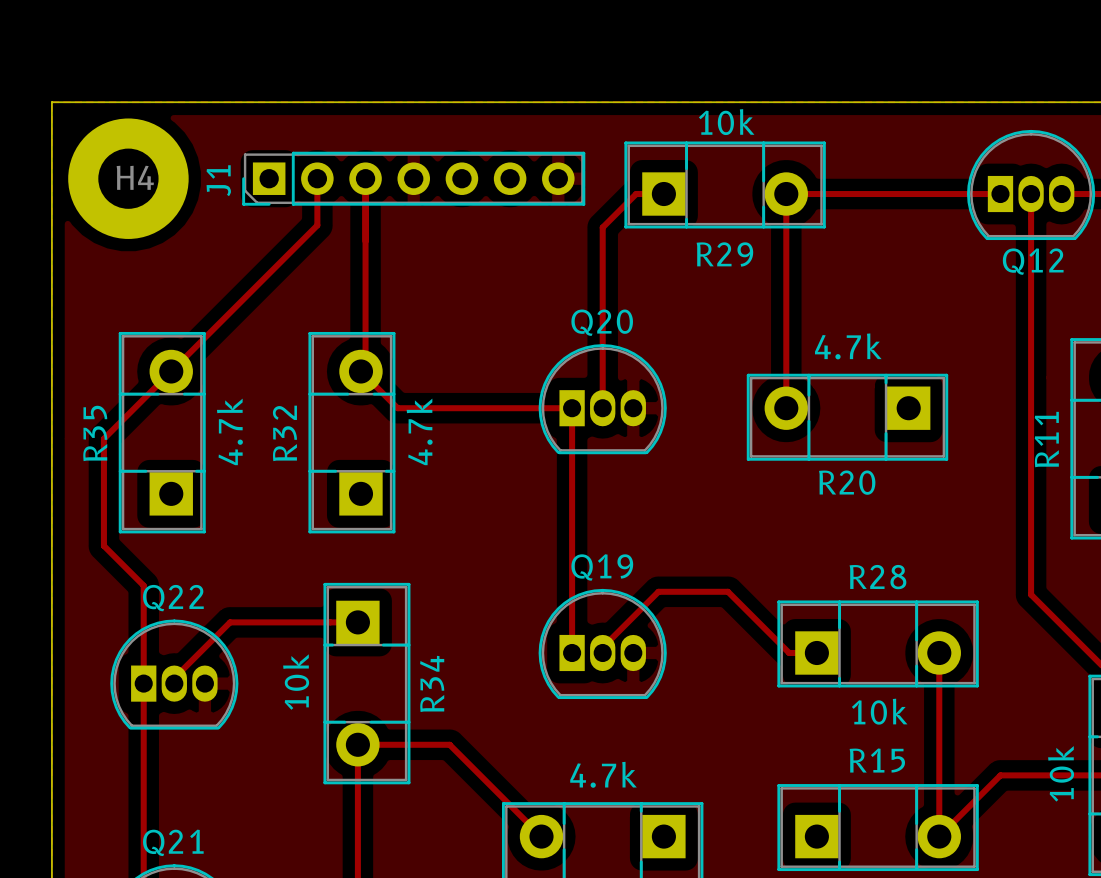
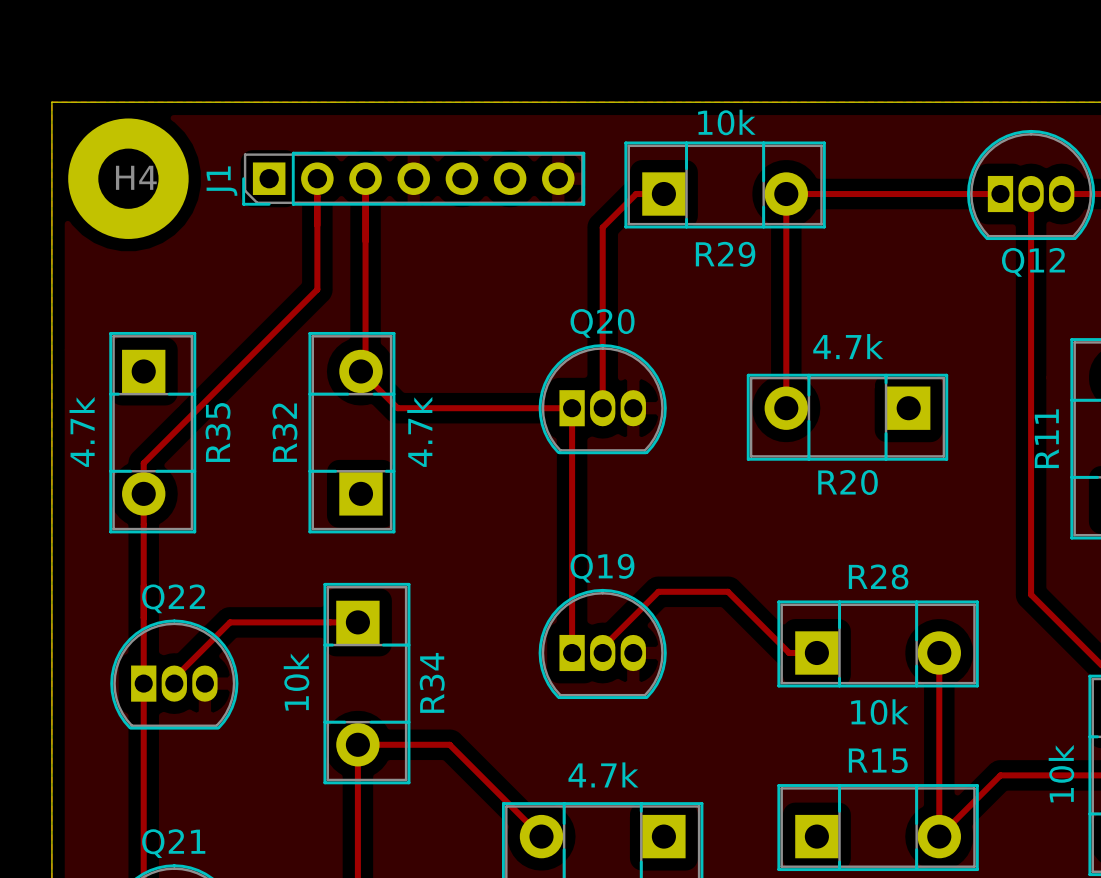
track: (317, 225) (103, 438) (103, 545) (143, 585) -> (317, 225) (317, 289) (143, 463) (143, 585)
R35 rotation: 0° (162, 432) -> 180° (152, 432)

